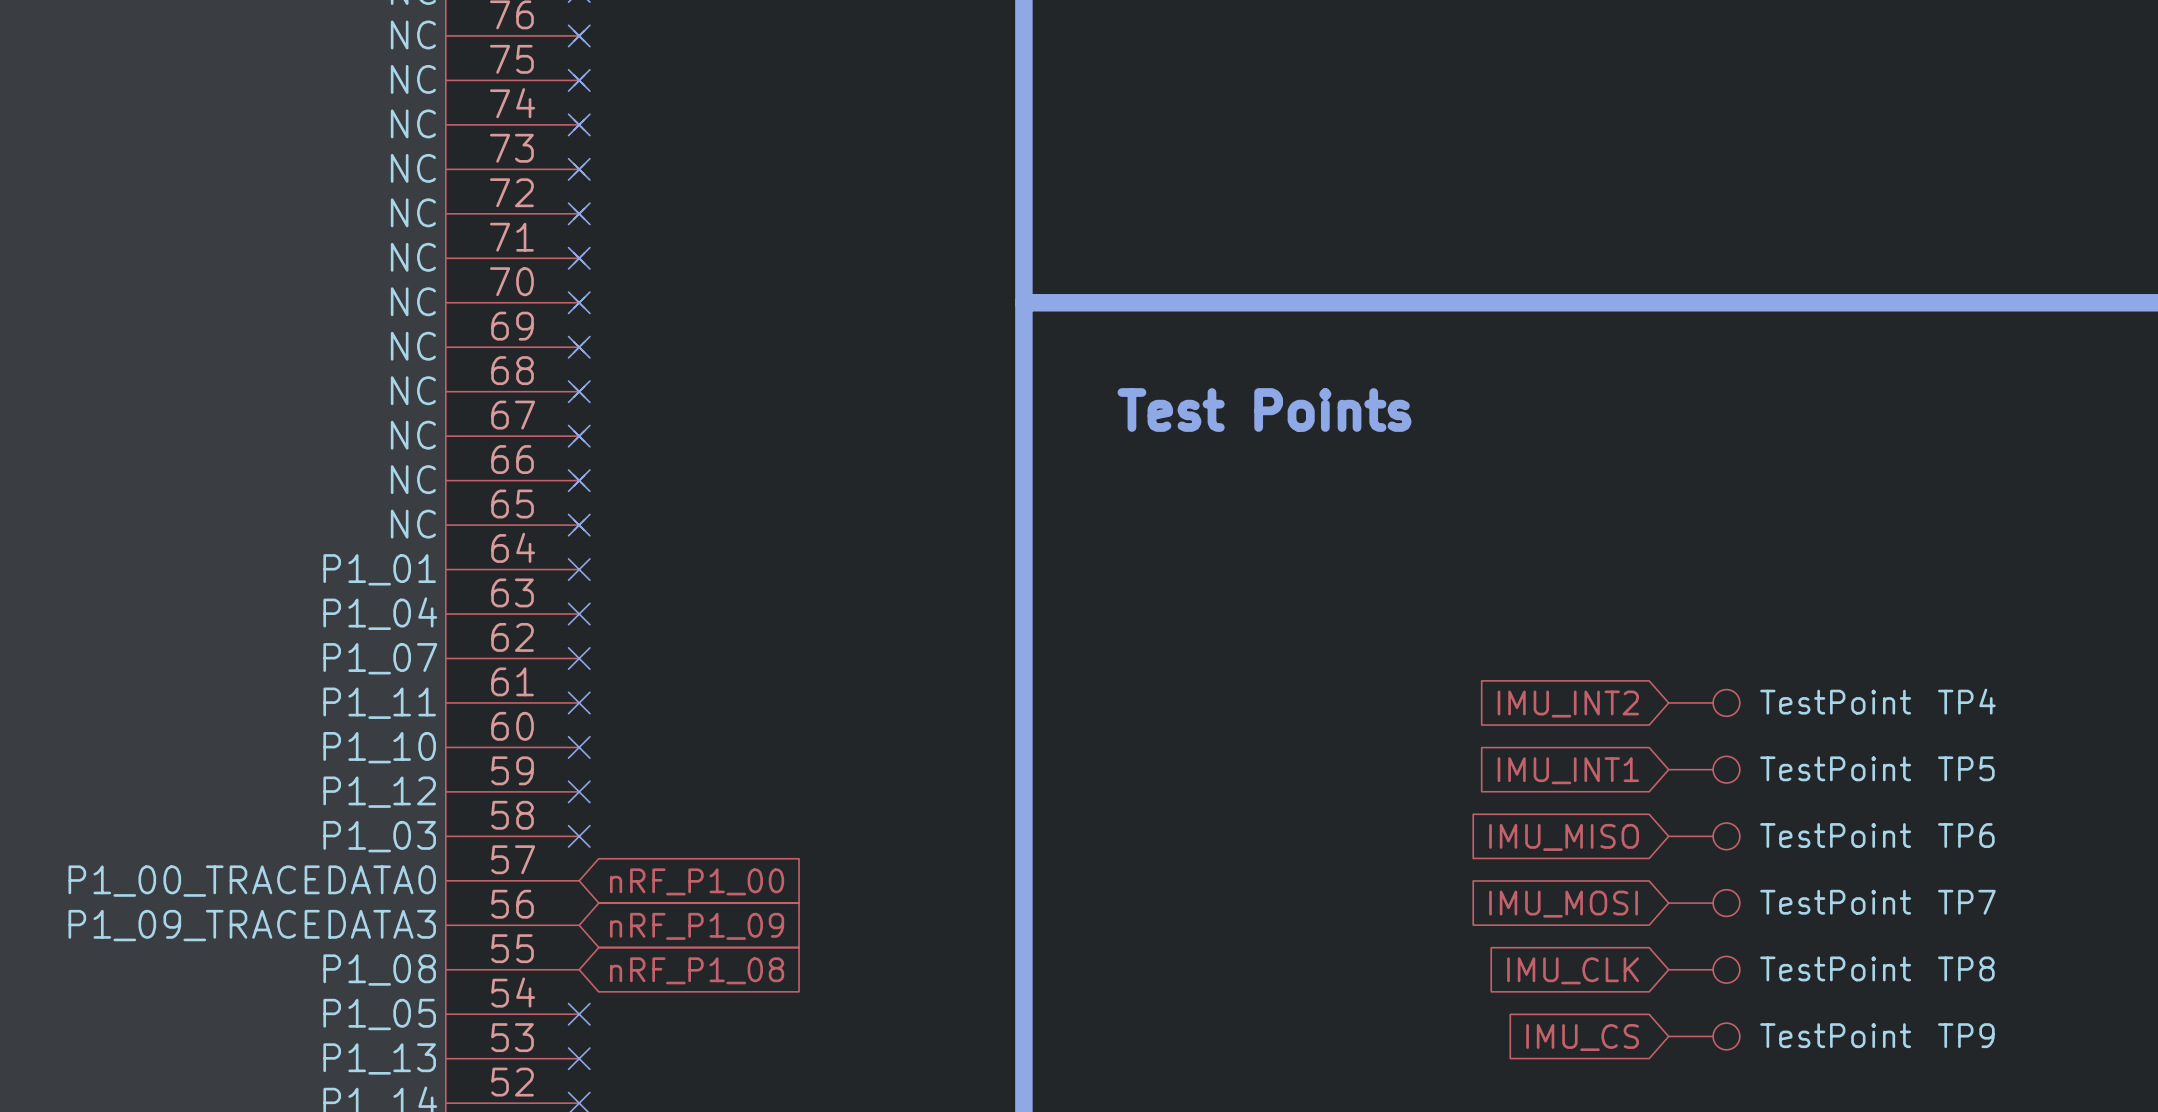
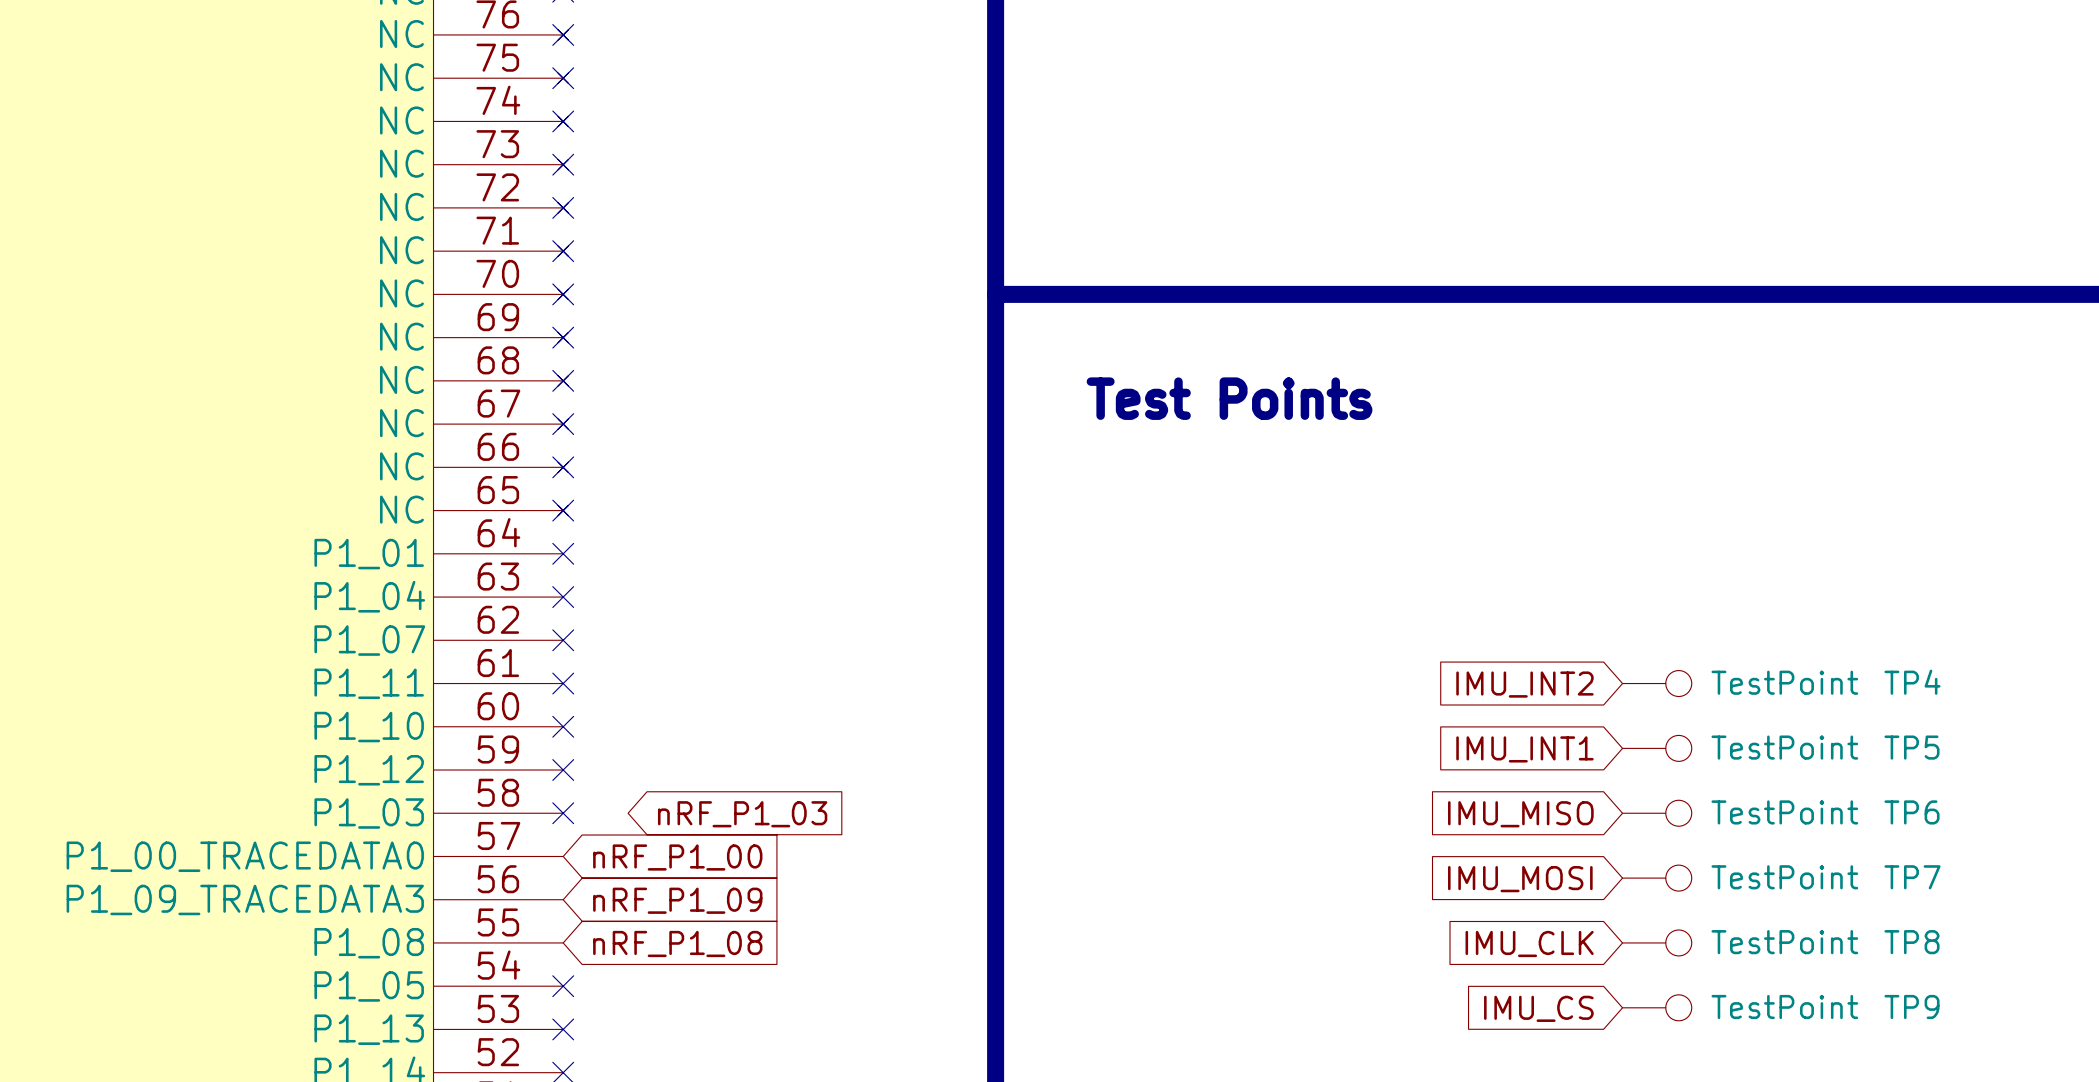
global label: none -> nRF_P1_03 (742, 814)

